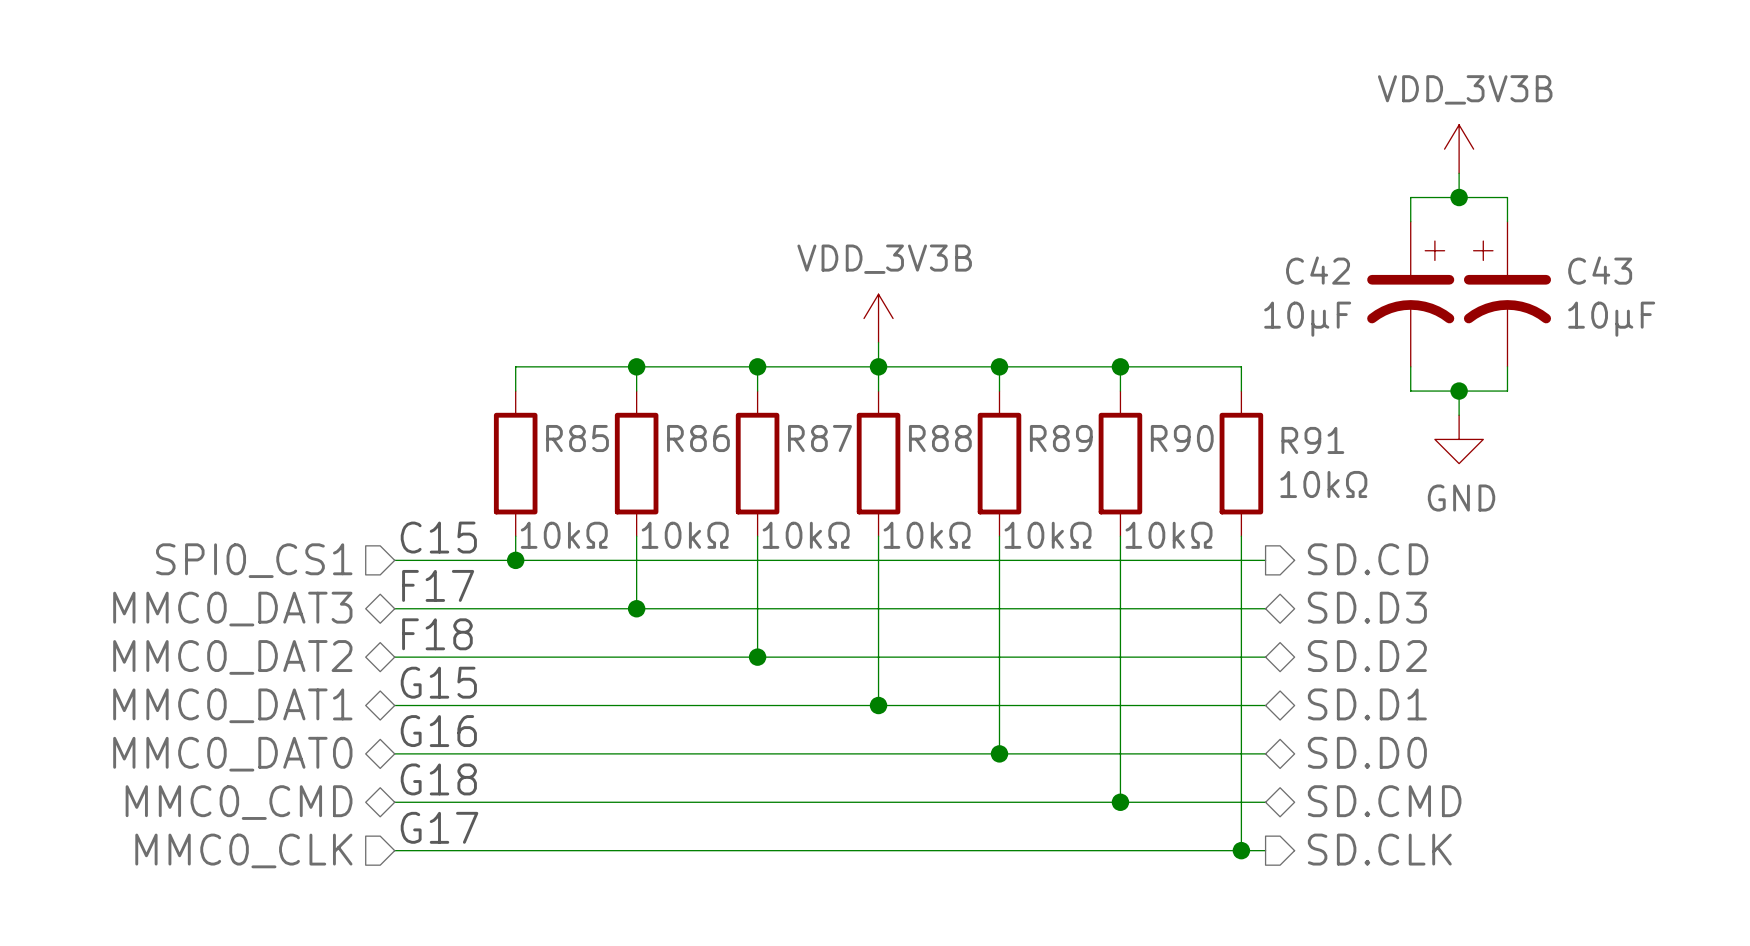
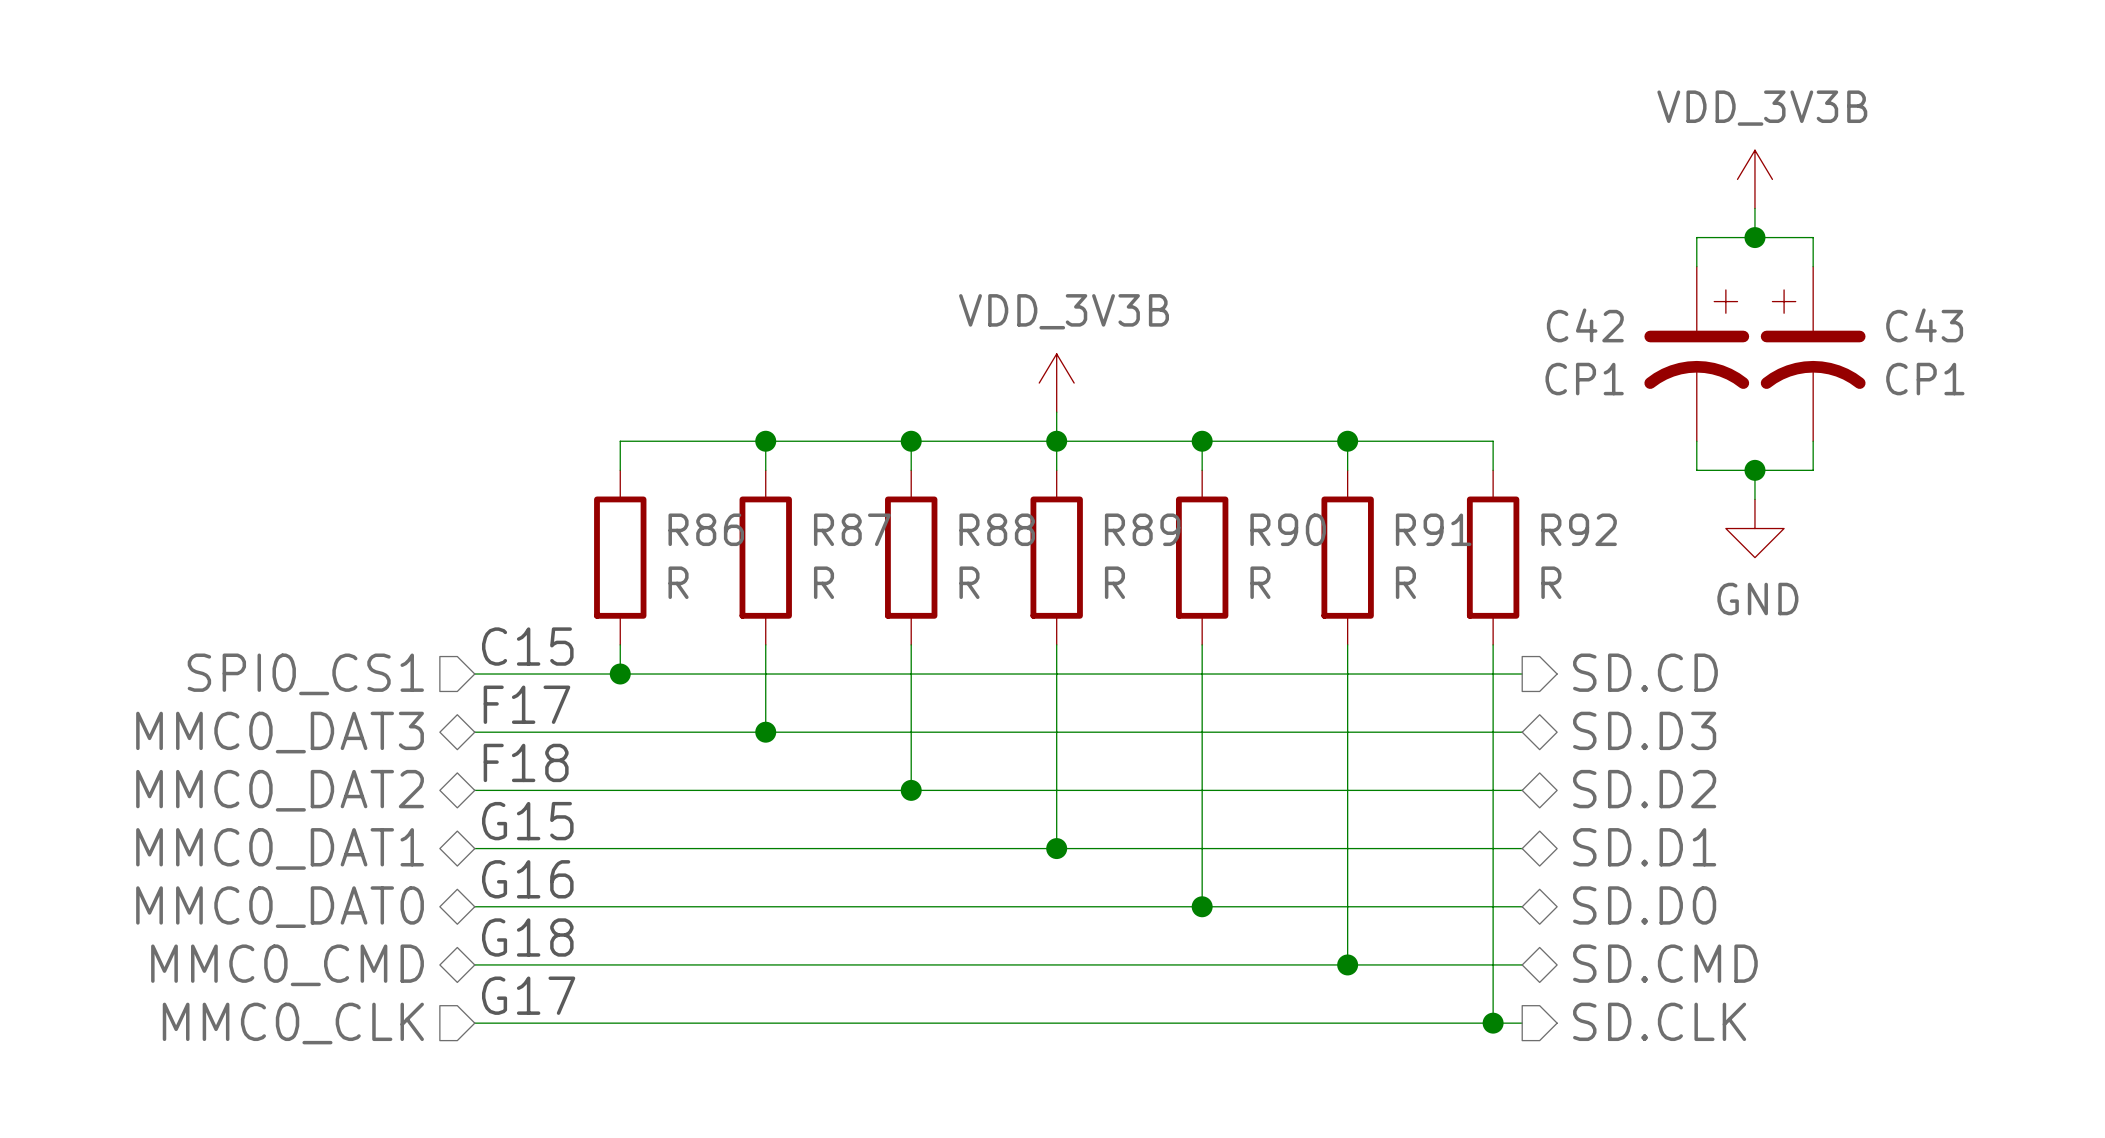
C42 value: 10μF (1307, 319) -> CP1 (1584, 379)
C43 value: 10μF (1611, 319) -> CP1 (1925, 379)
R85 name: R85 (577, 438) -> R86 (706, 529)
R86 name: R86 (698, 438) -> R87 (852, 529)
R87 name: R87 (819, 438) -> R88 (997, 529)
R88 name: R88 (940, 438) -> R89 (1142, 529)
R89 name: R89 (1061, 438) -> R90 (1288, 529)
R90 name: R90 (1182, 438) -> R91 (1433, 529)
R91 name: R91 (1312, 440) -> R92 (1579, 529)
R91 value: 10kΩ (1323, 484) -> R (1551, 582)
R85 value: 10kΩ (564, 535) -> R (678, 582)
R86 value: 10kΩ (685, 535) -> R (824, 582)
R87 value: 10kΩ (806, 535) -> R (969, 582)
R88 value: 10kΩ (927, 535) -> R (1114, 582)
R89 value: 10kΩ (1048, 535) -> R (1260, 582)
R90 value: 10kΩ (1169, 535) -> R (1405, 582)

